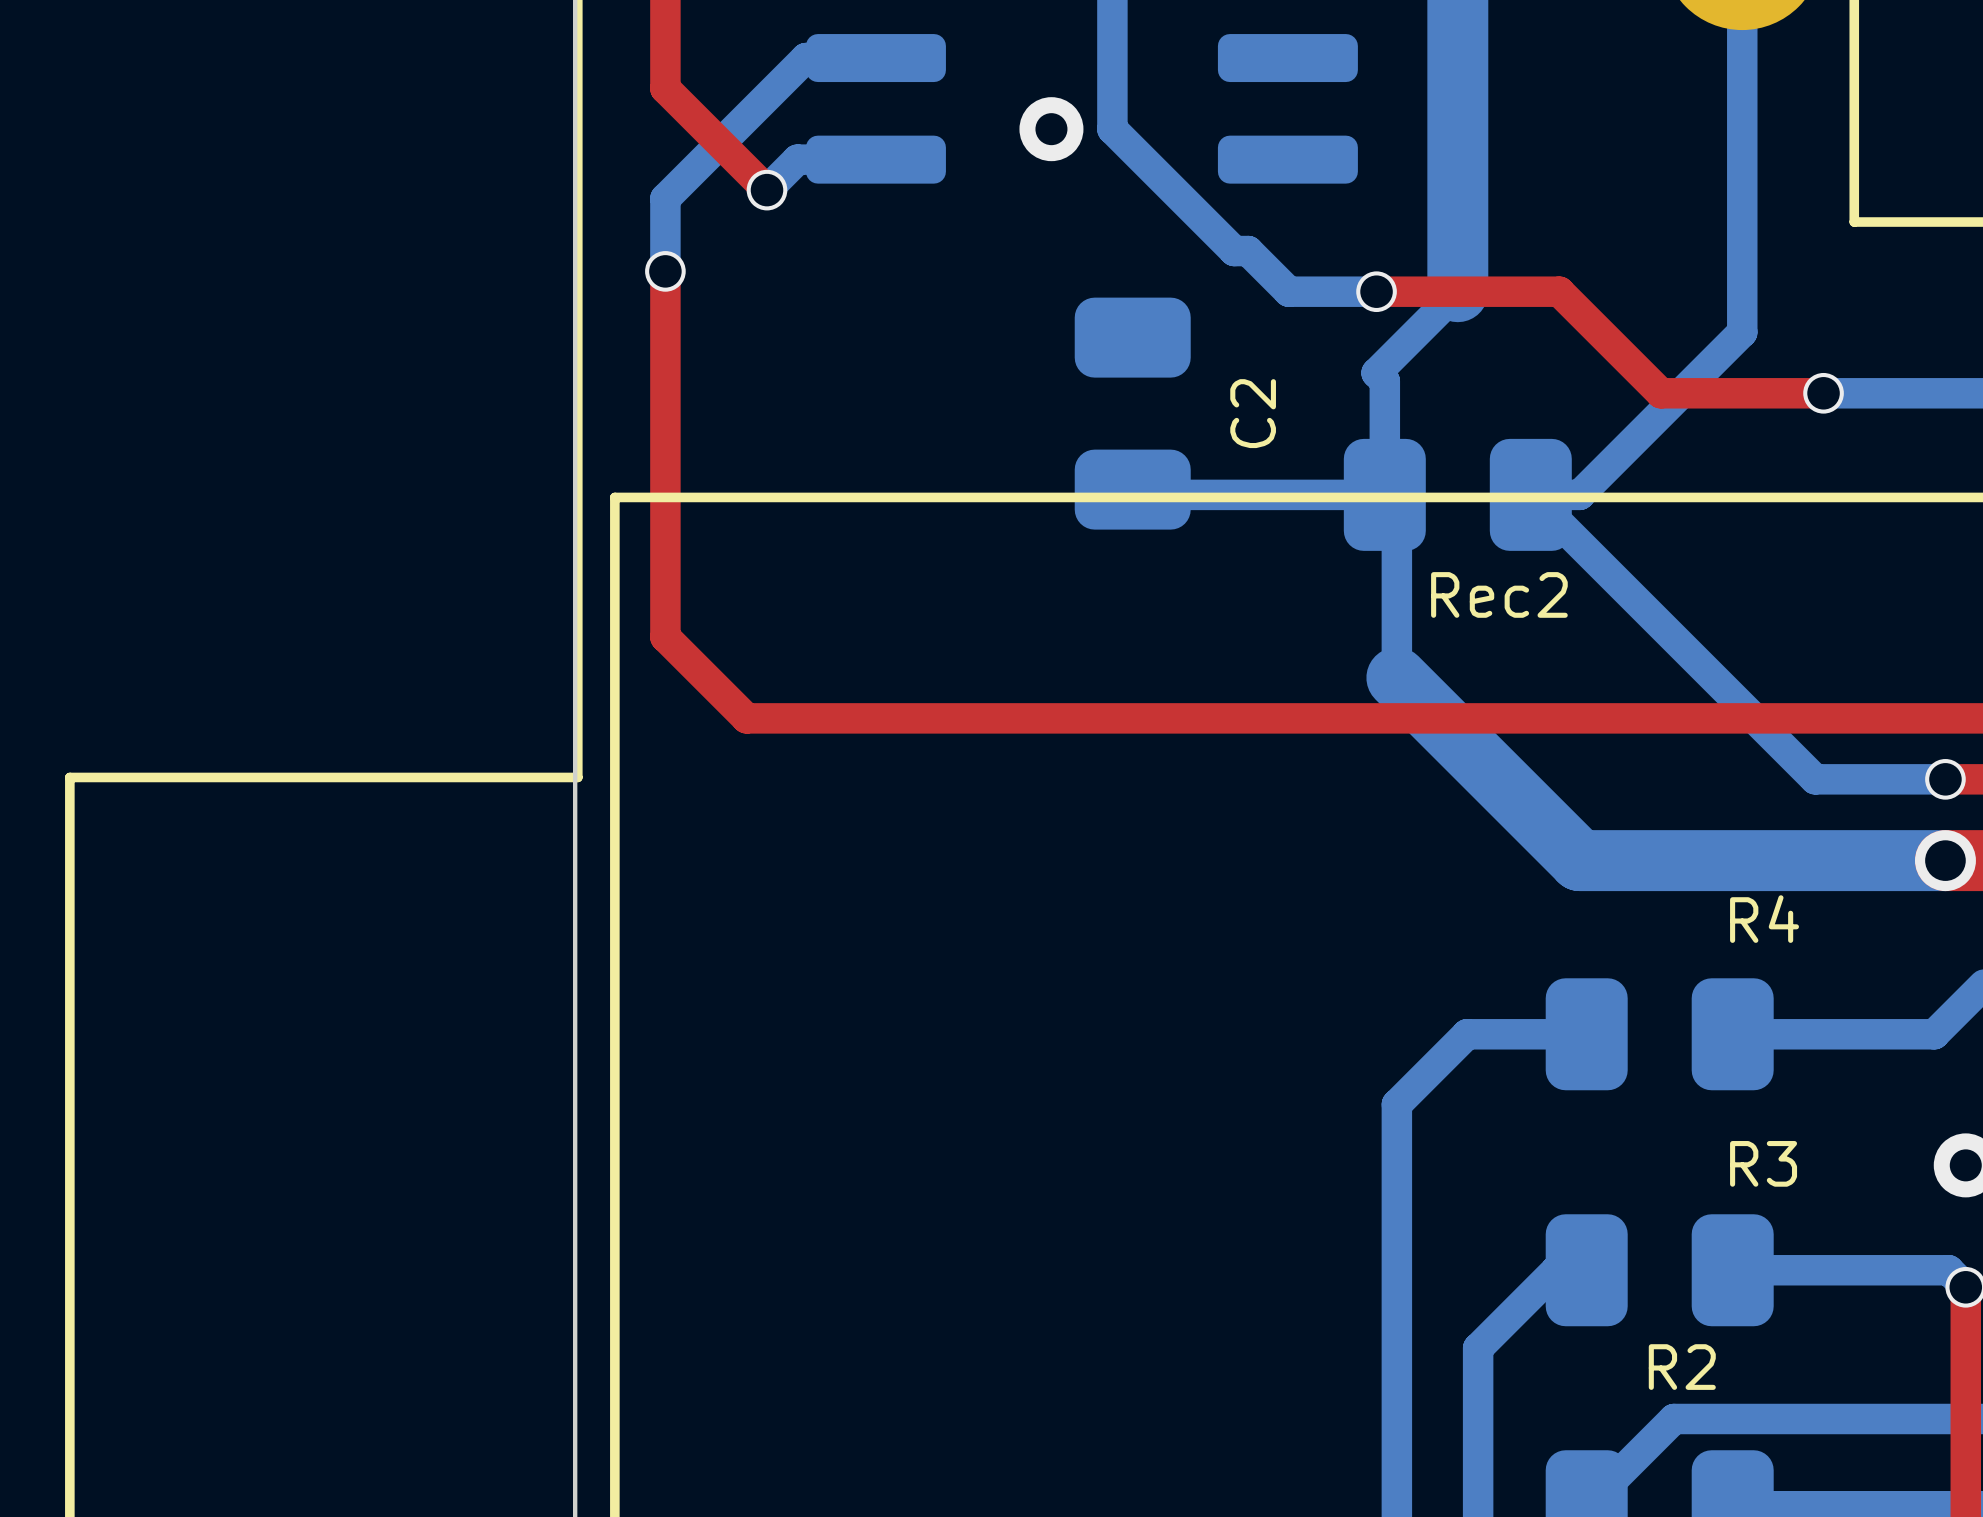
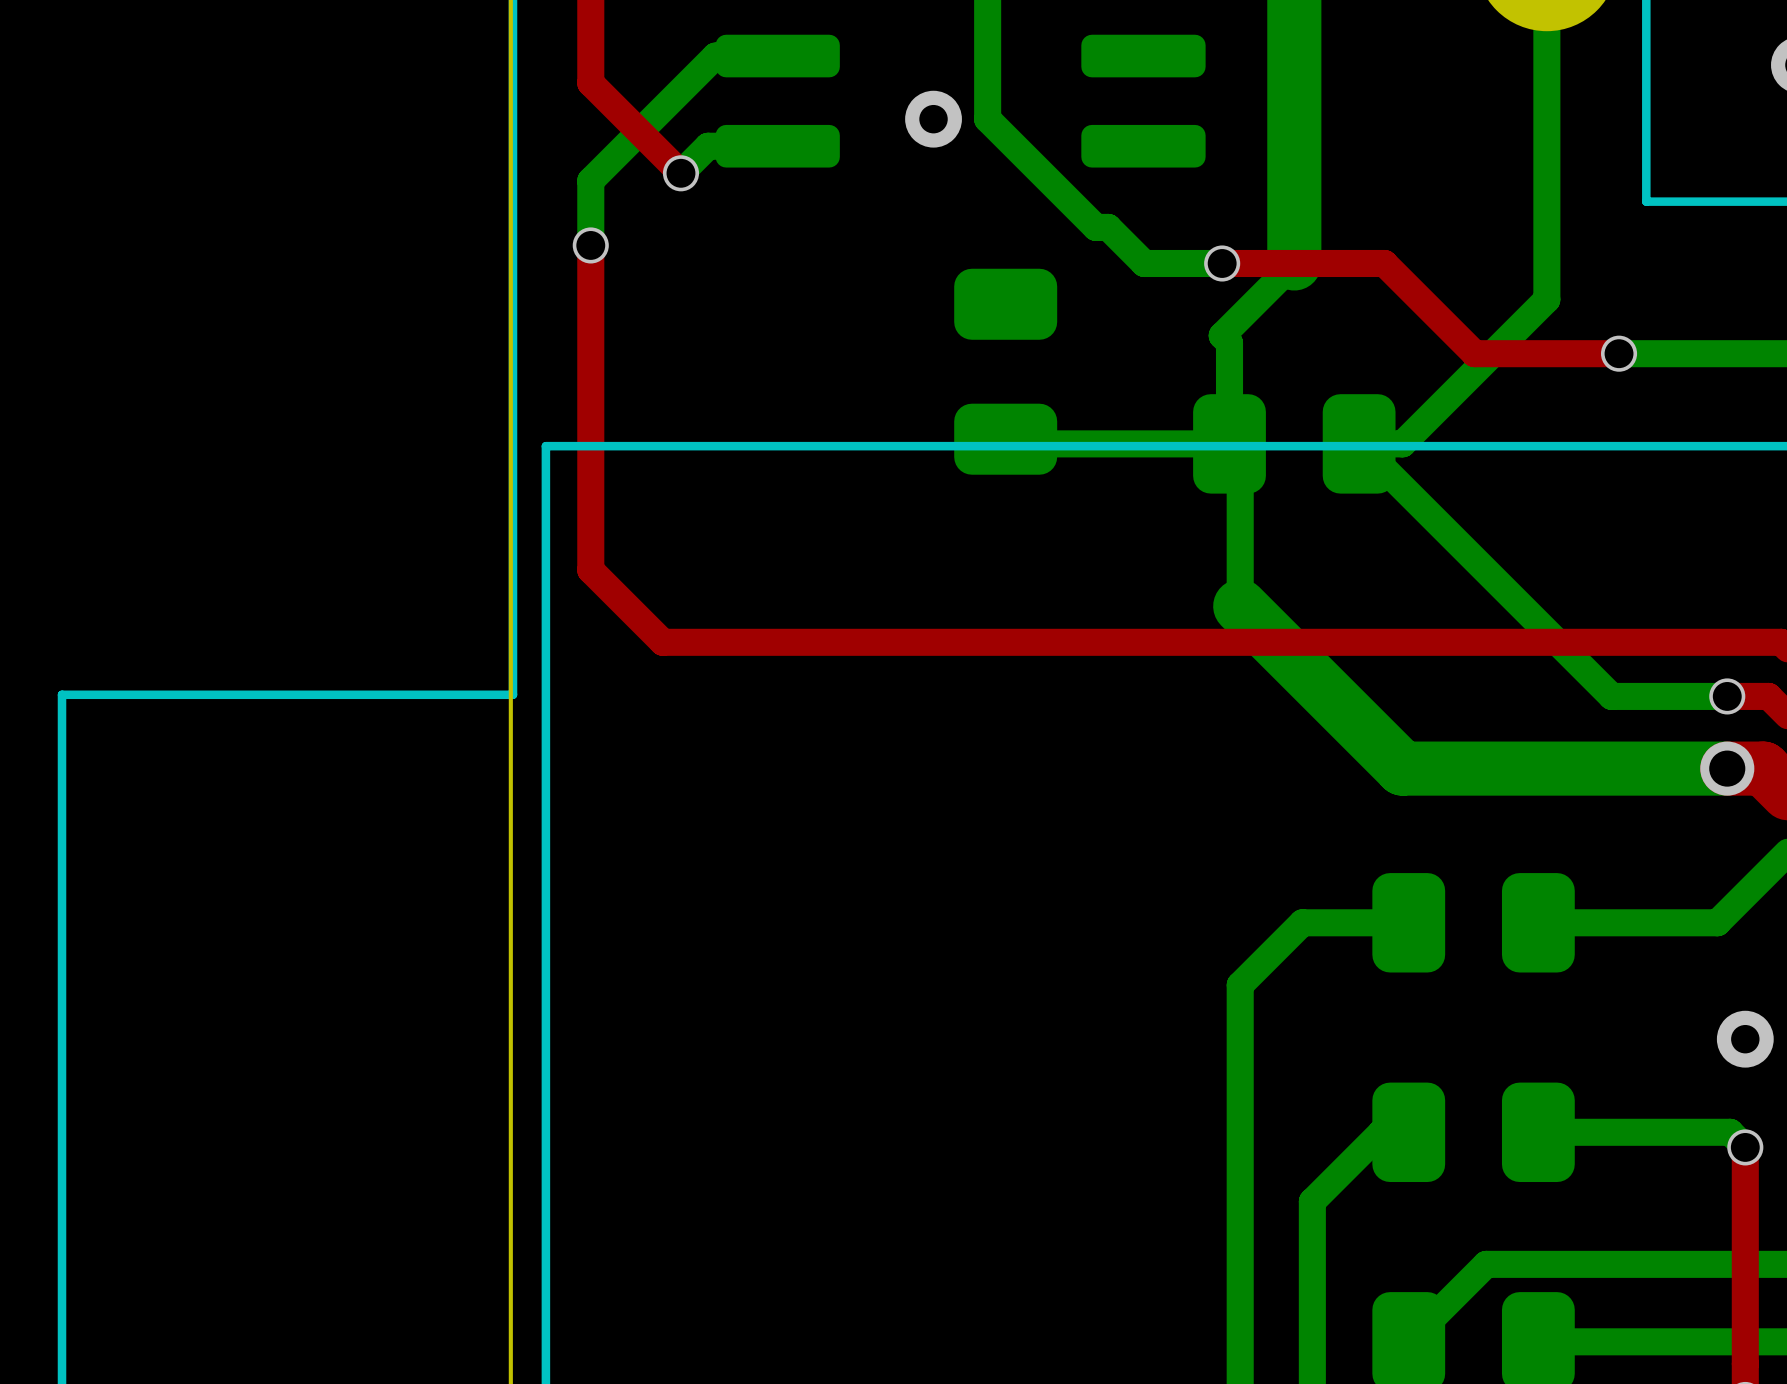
C2 name: C2 (1253, 413) -> none
Rec2 name: Rec2 (1499, 594) -> none
R4 name: R4 (1764, 919) -> none
R3 name: R3 (1763, 1163) -> none
R2 name: R2 (1682, 1367) -> none

